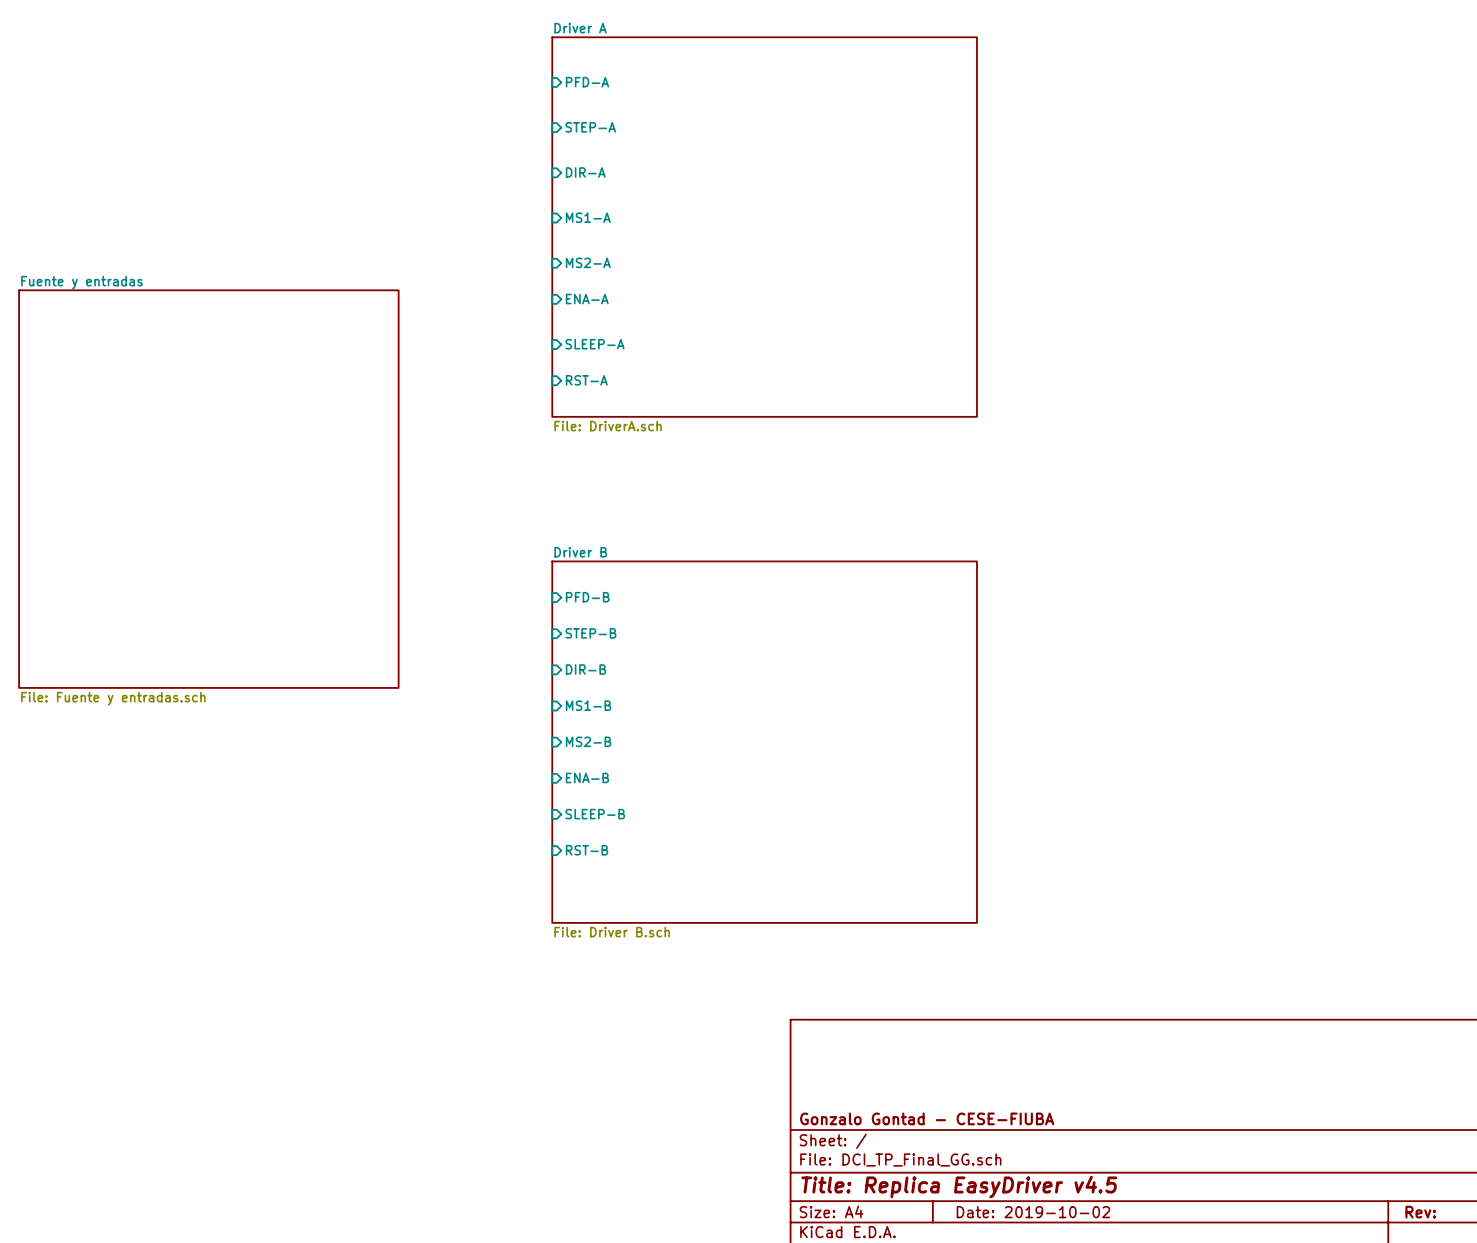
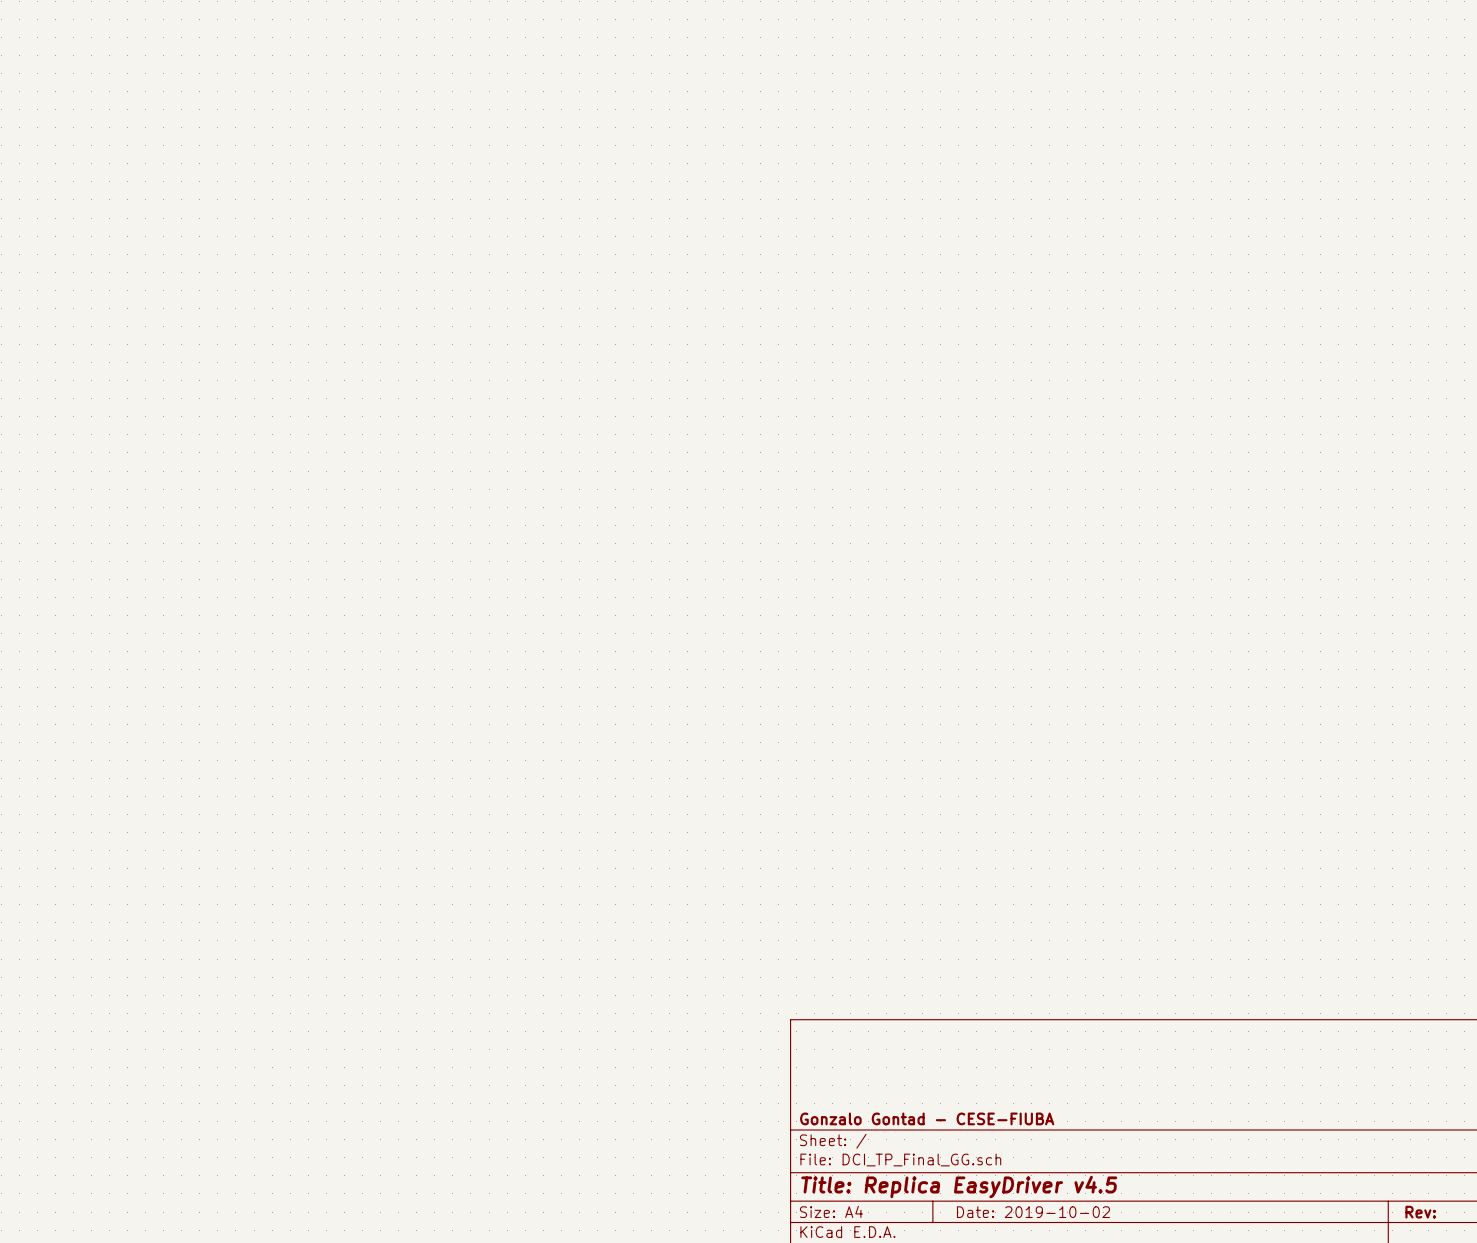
sheet pin: PFD-A (587, 82) -> none
sheet pin: STEP-A (590, 127) -> none
sheet pin: DIR-A (585, 172) -> none
sheet pin: MS1-A (588, 217) -> none
sheet Driver A: File: DriverA.sch (764, 227) -> none
sheet pin: MS2-A (588, 262) -> none
sheet pin: ENA-A (587, 299) -> none
sheet pin: SLEEP-A (595, 344) -> none
sheet pin: RST-A (586, 380) -> none
sheet Fuente y entradas: File: Fuente y entradas.sch (208, 489) -> none
sheet pin: PFD-B (587, 597) -> none
sheet pin: STEP-B (590, 633) -> none
sheet pin: DIR-B (585, 669) -> none
sheet pin: MS1-B (588, 705) -> none
sheet pin: MS2-B (588, 741) -> none
sheet Driver B: File: Driver B.sch (764, 742) -> none
sheet pin: ENA-B (587, 777) -> none
sheet pin: SLEEP-B (595, 814) -> none
sheet pin: RST-B (587, 850) -> none

